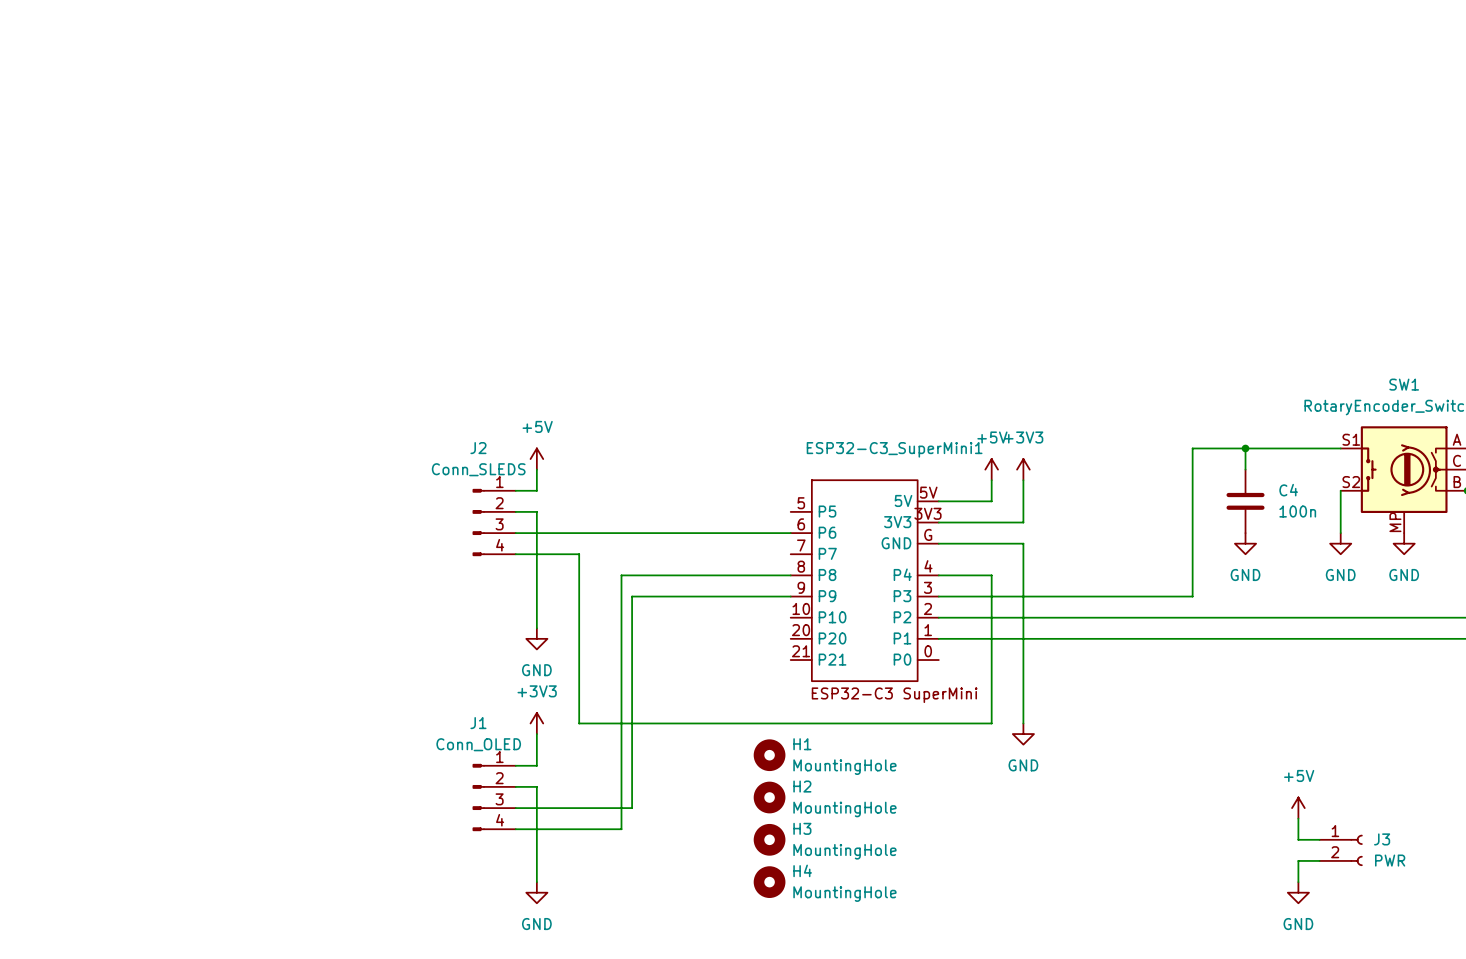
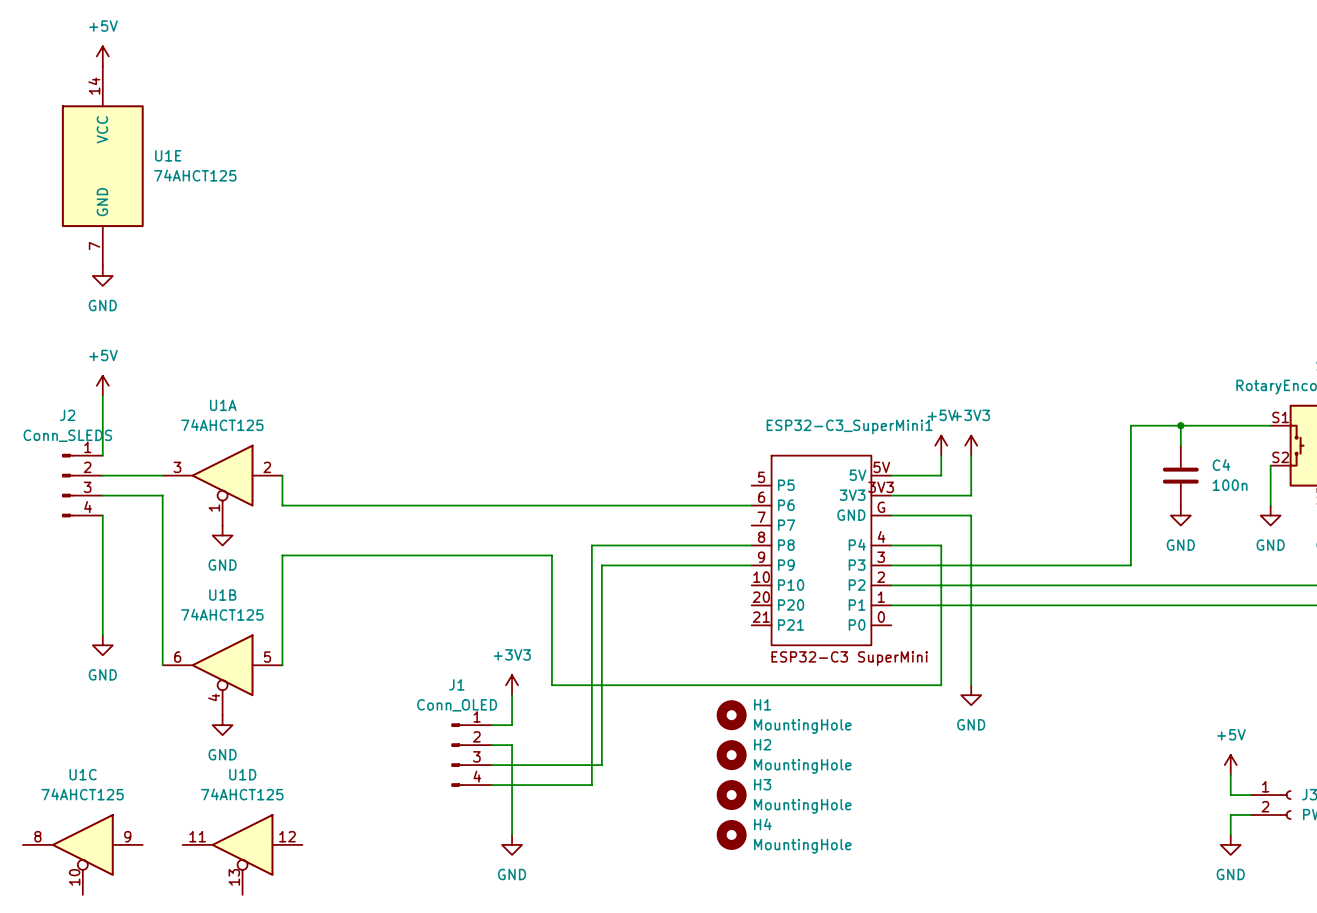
power symbol: none -> +5V (102, 56)
U1E: none -> 74AHCT125 (102, 166)
power symbol: none -> GND (102, 275)
power symbol: none -> +5V (102, 385)
wire: none -> (102, 395) (102, 455)
power symbol: +5V (536, 459) -> none
wire: (536, 469) (536, 490) (515, 490) -> none
wire: none -> (102, 475) (162, 475)
wire: none -> (282, 475) (282, 505) (492, 505)
U1A: none -> 74AHCT125 (222, 485)
wire: (515, 511) (536, 511) (536, 628) -> none
wire: none -> (102, 495) (162, 495) (162, 665)
J2 position: (494, 522) -> (82, 485)
wire: none -> (102, 515) (102, 635)
wire: (515, 554) (579, 554) (579, 585) -> (282, 665) (282, 555) (551, 555)
power symbol: none -> GND (222, 535)
power symbol: GND (536, 638) -> none
power symbol: none -> GND (102, 645)
U1B: none -> 74AHCT125 (222, 674)
power symbol: none -> GND (222, 725)
U1C: none -> 74AHCT125 (82, 854)
U1D: none -> 74AHCT125 (242, 854)

